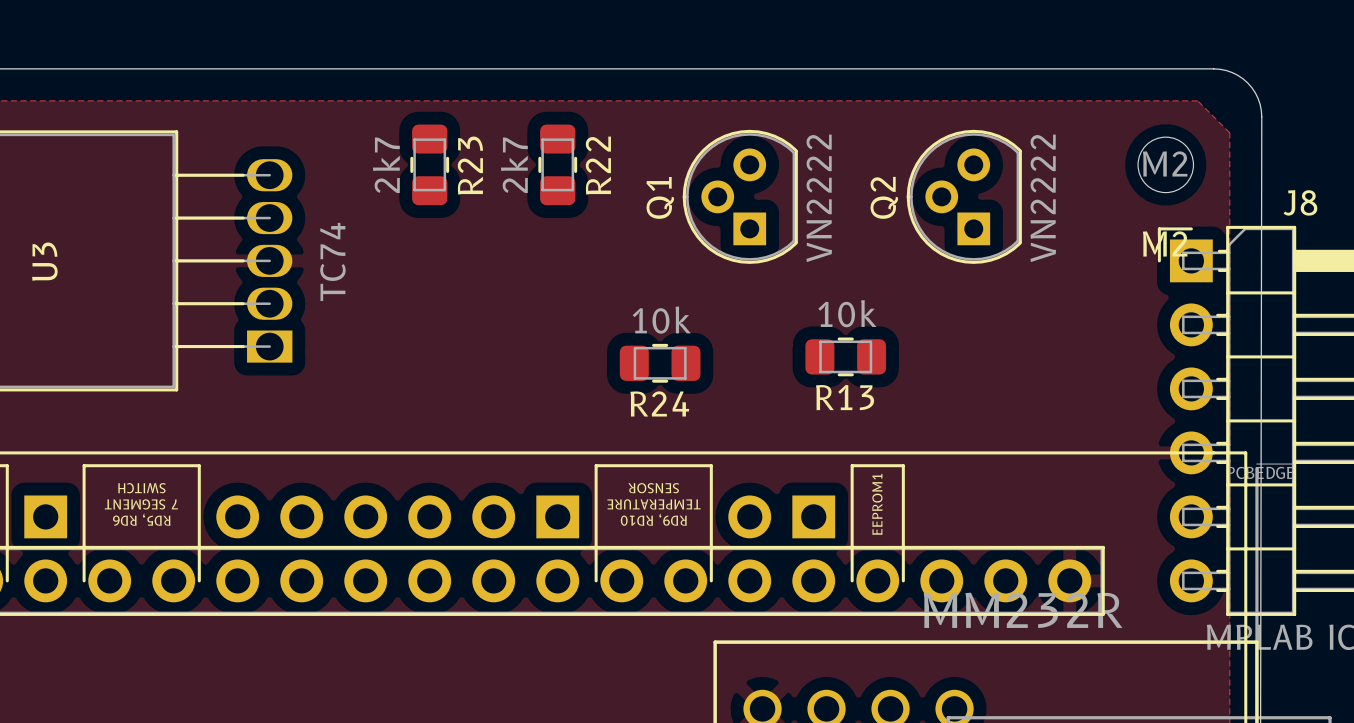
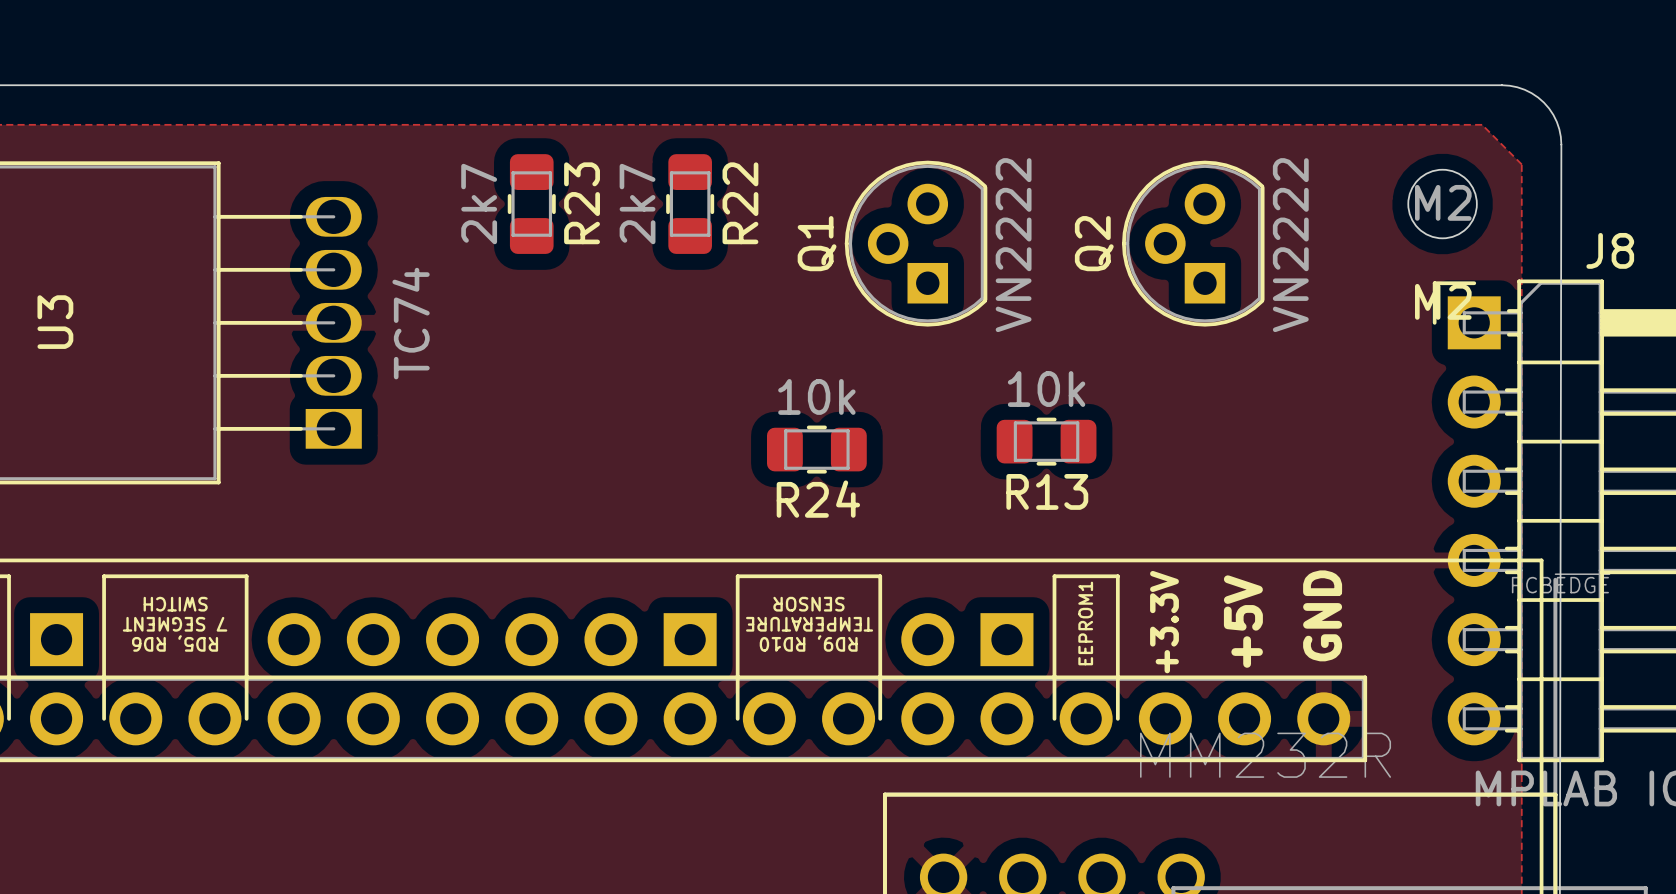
text: none -> GND (1322, 615)
text: none -> +3.3V (1164, 622)
text: none -> +5V (1243, 621)

